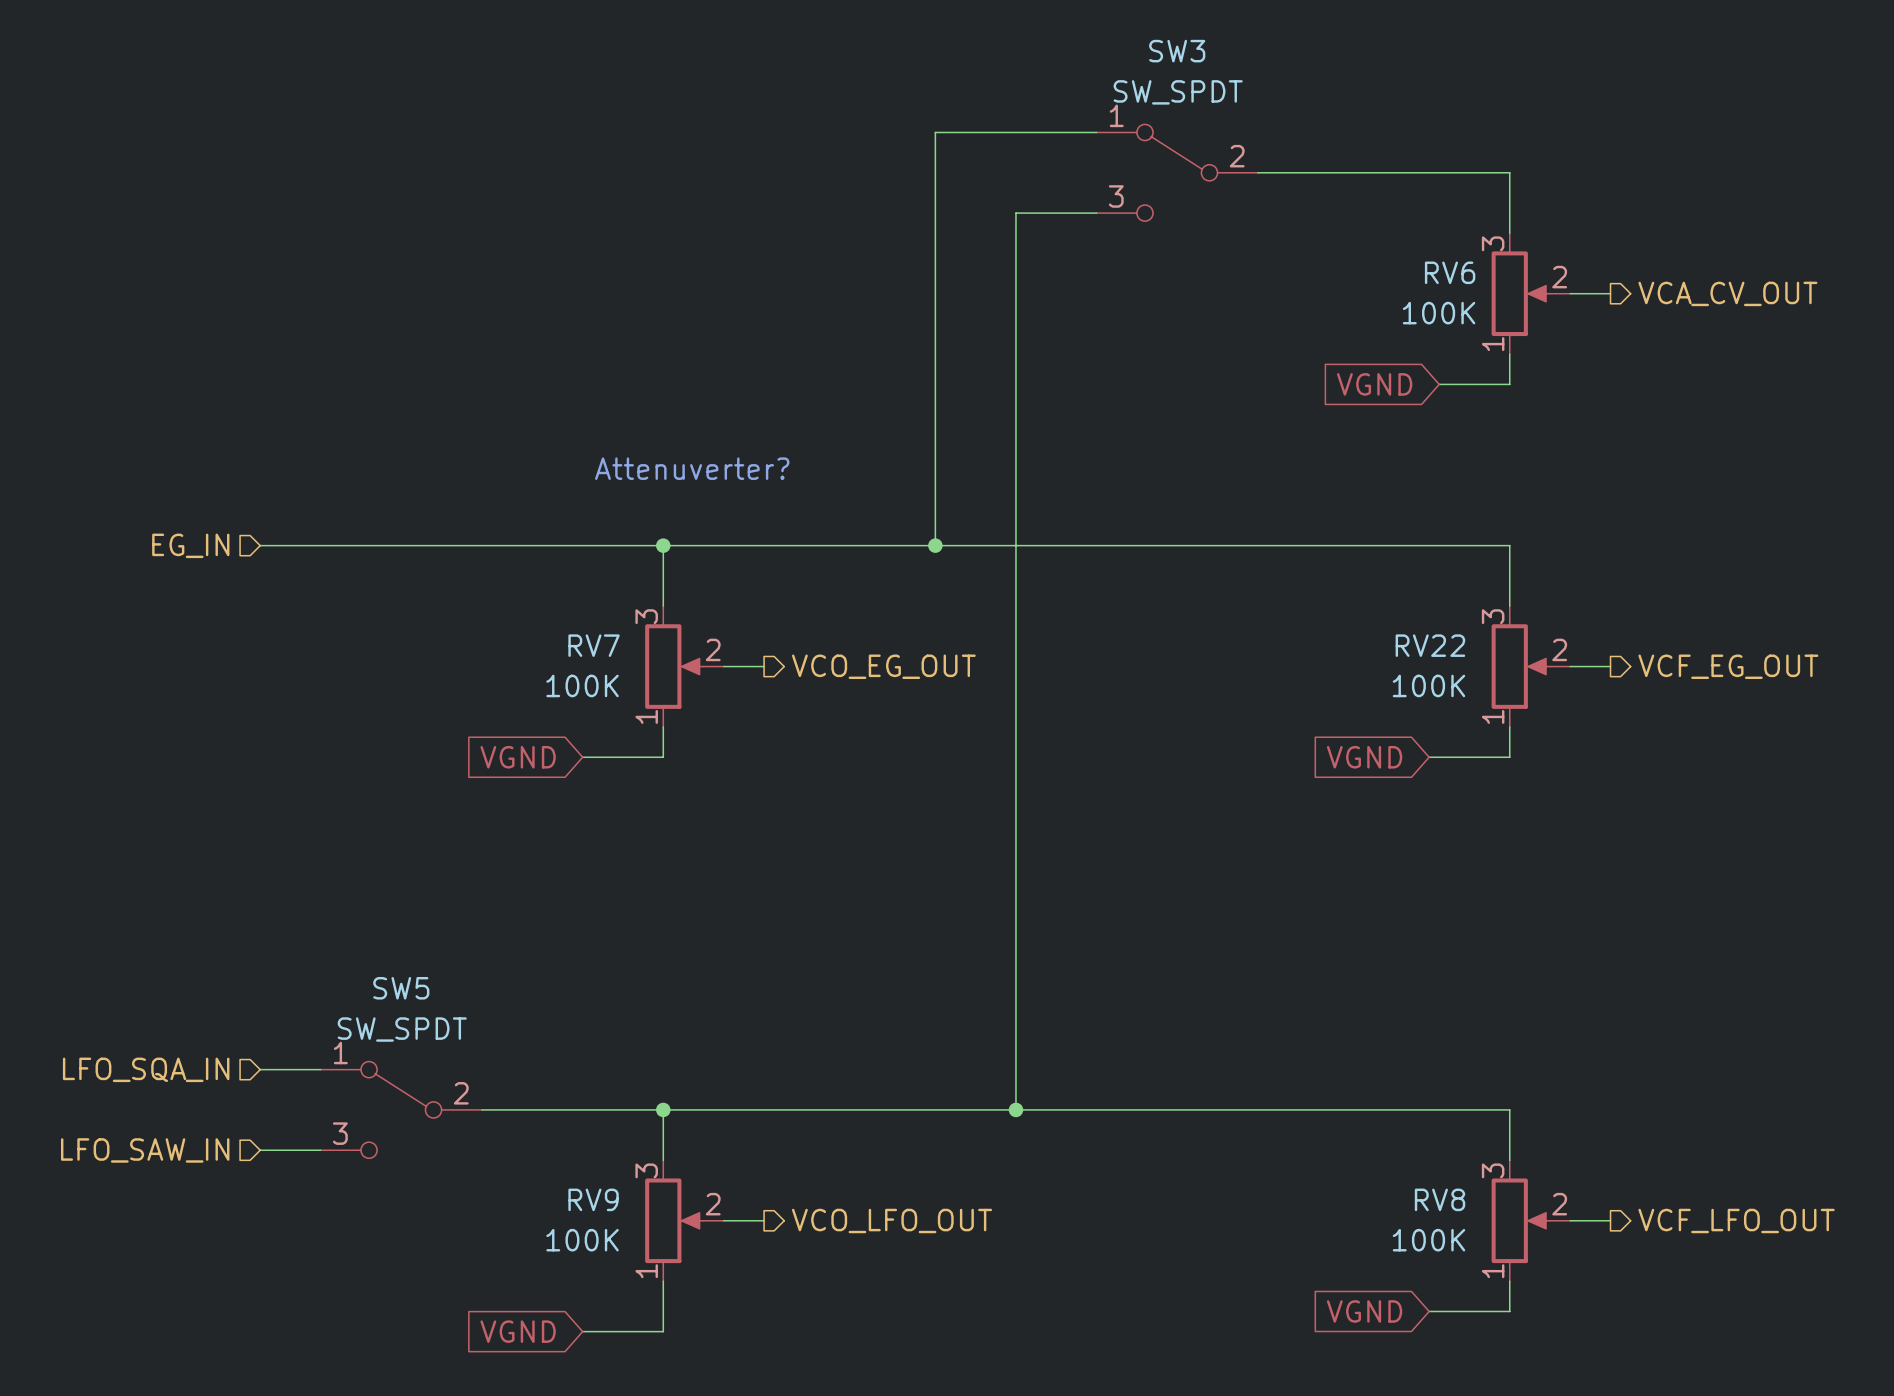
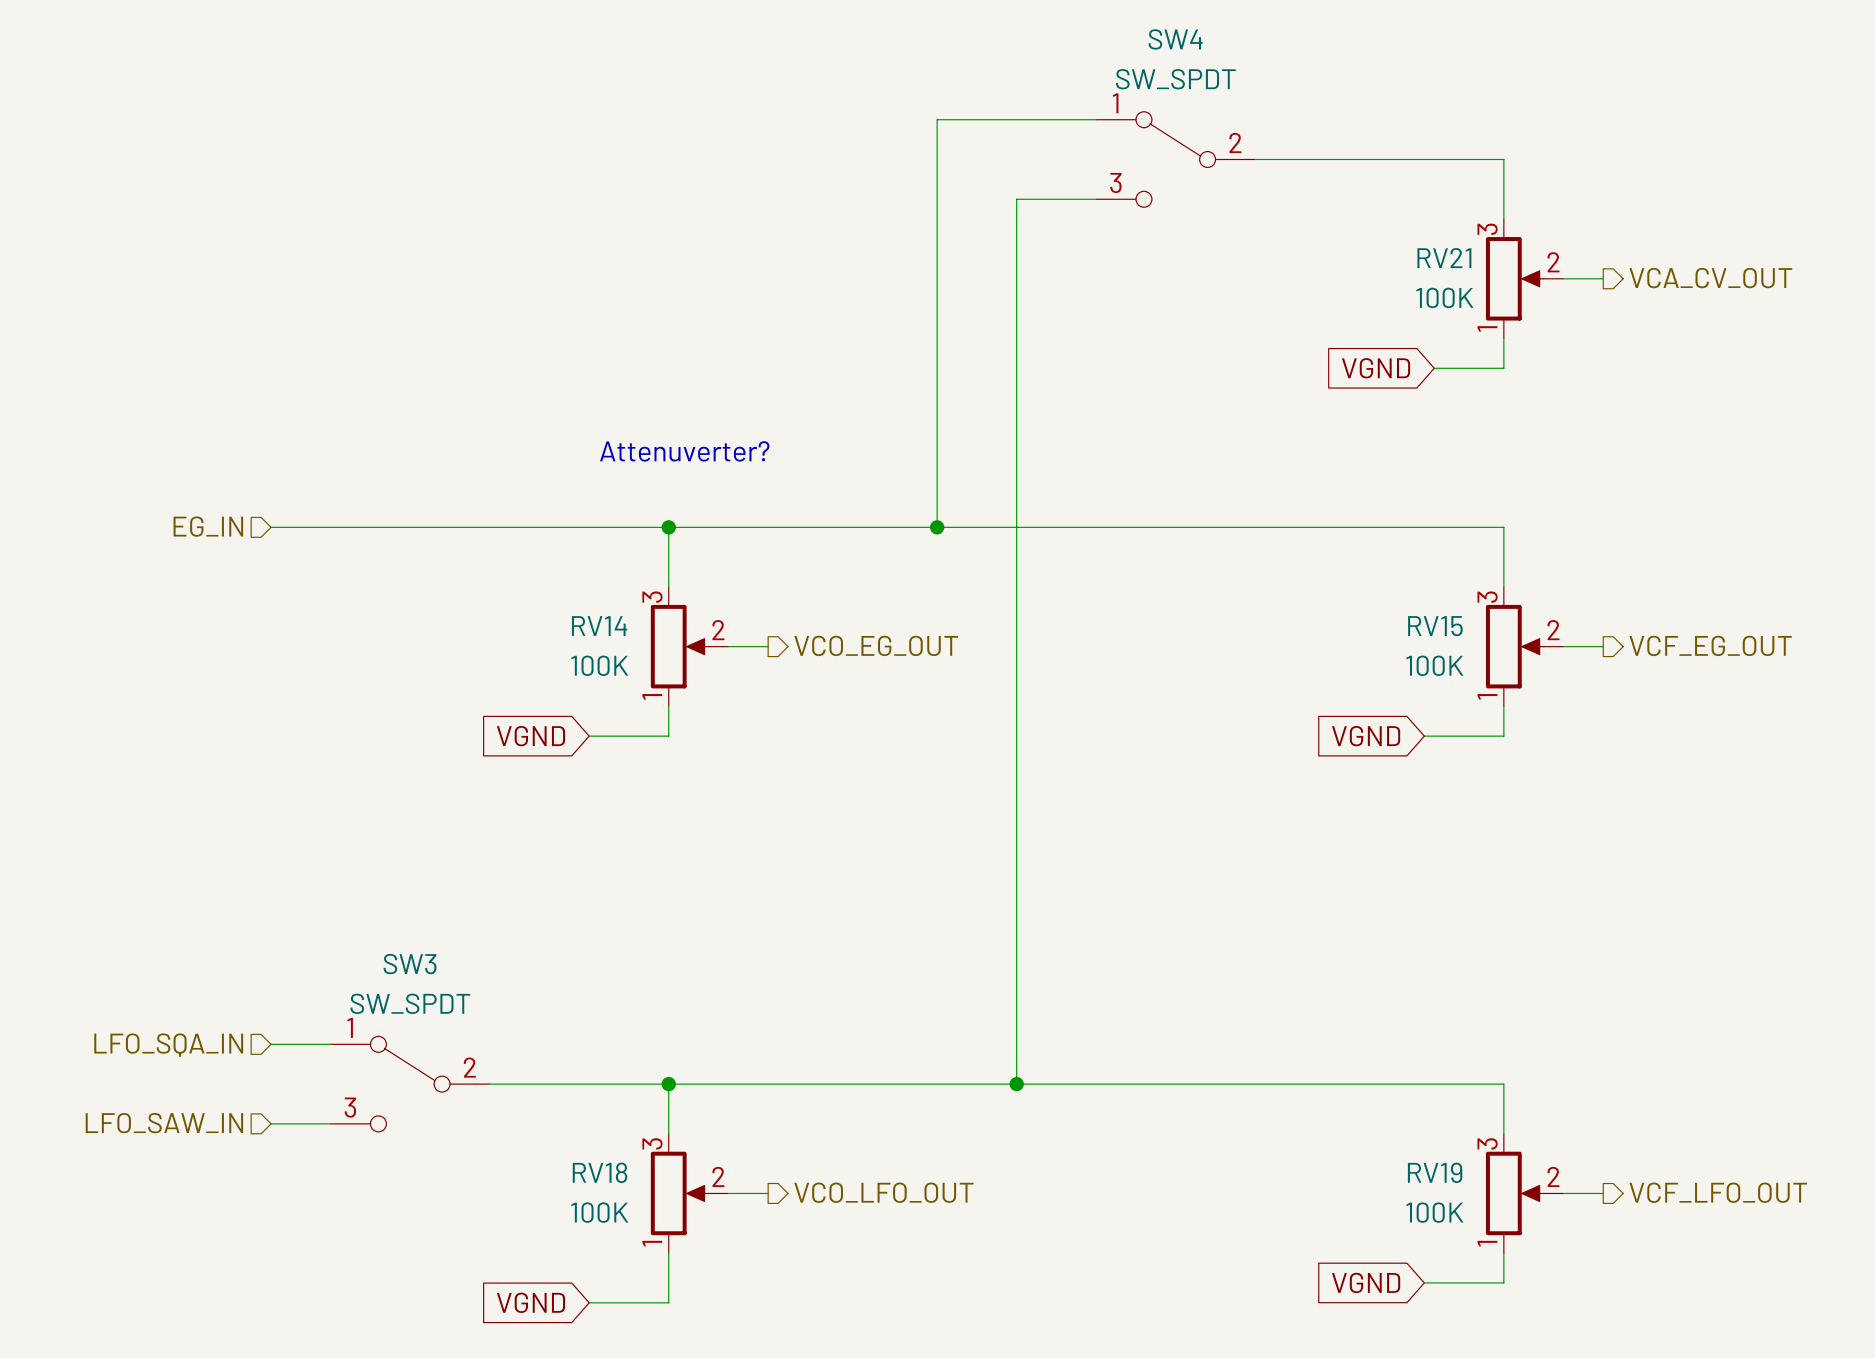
SW3 name: SW3 (1177, 51) -> SW4 (1175, 39)
RV6 name: RV6 (1450, 272) -> RV21 (1444, 258)
RV7 name: RV7 (594, 645) -> RV14 (599, 626)
RV22 name: RV22 (1430, 645) -> RV15 (1435, 626)
SW5 name: SW5 (401, 988) -> SW3 (410, 964)
RV9 name: RV9 (593, 1199) -> RV18 (600, 1172)
RV8 name: RV8 (1440, 1199) -> RV19 (1435, 1172)

